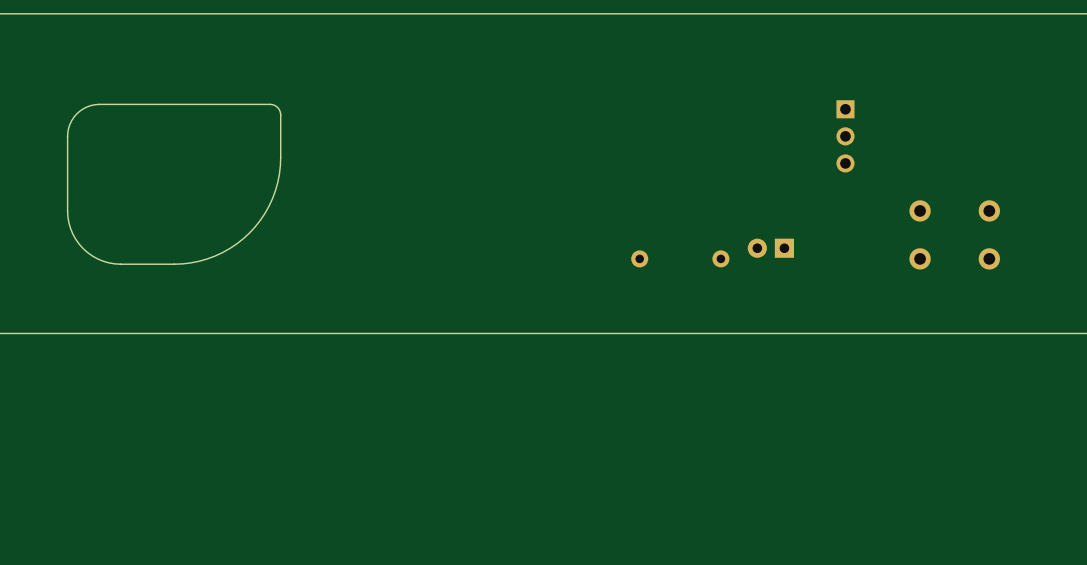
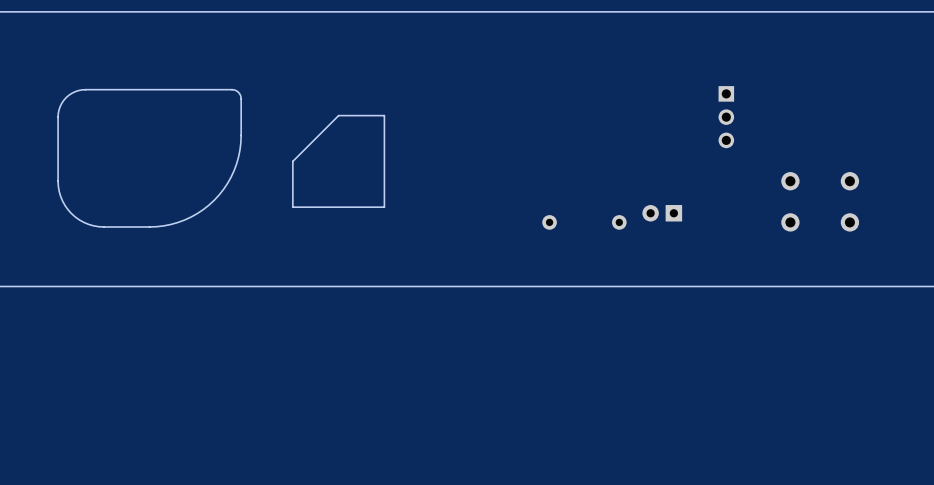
board edge: none -> (384, 115) (384, 207) (292, 207) (292, 161) (338, 115) (384, 115)

